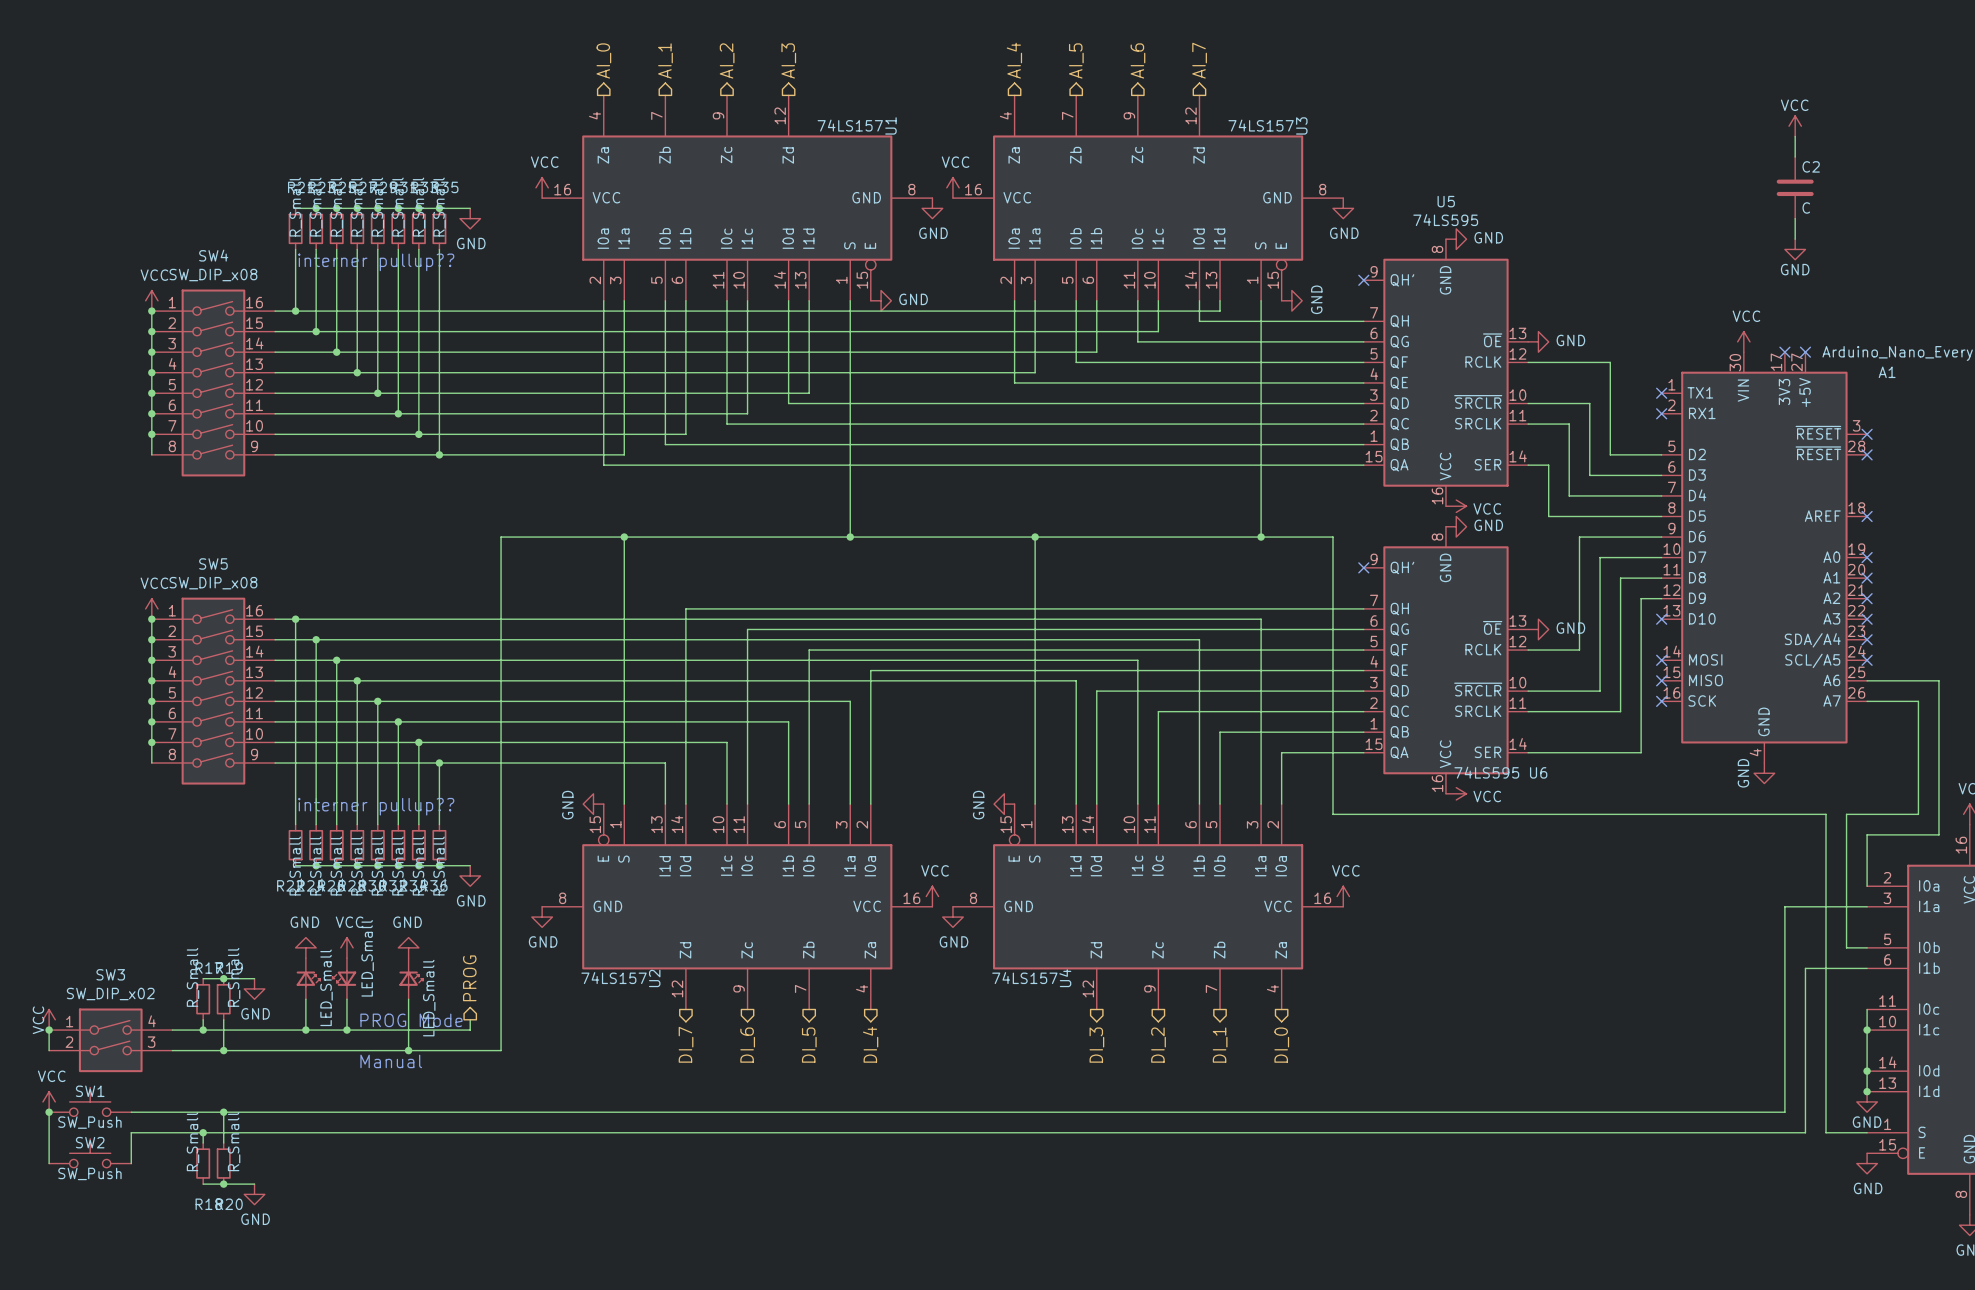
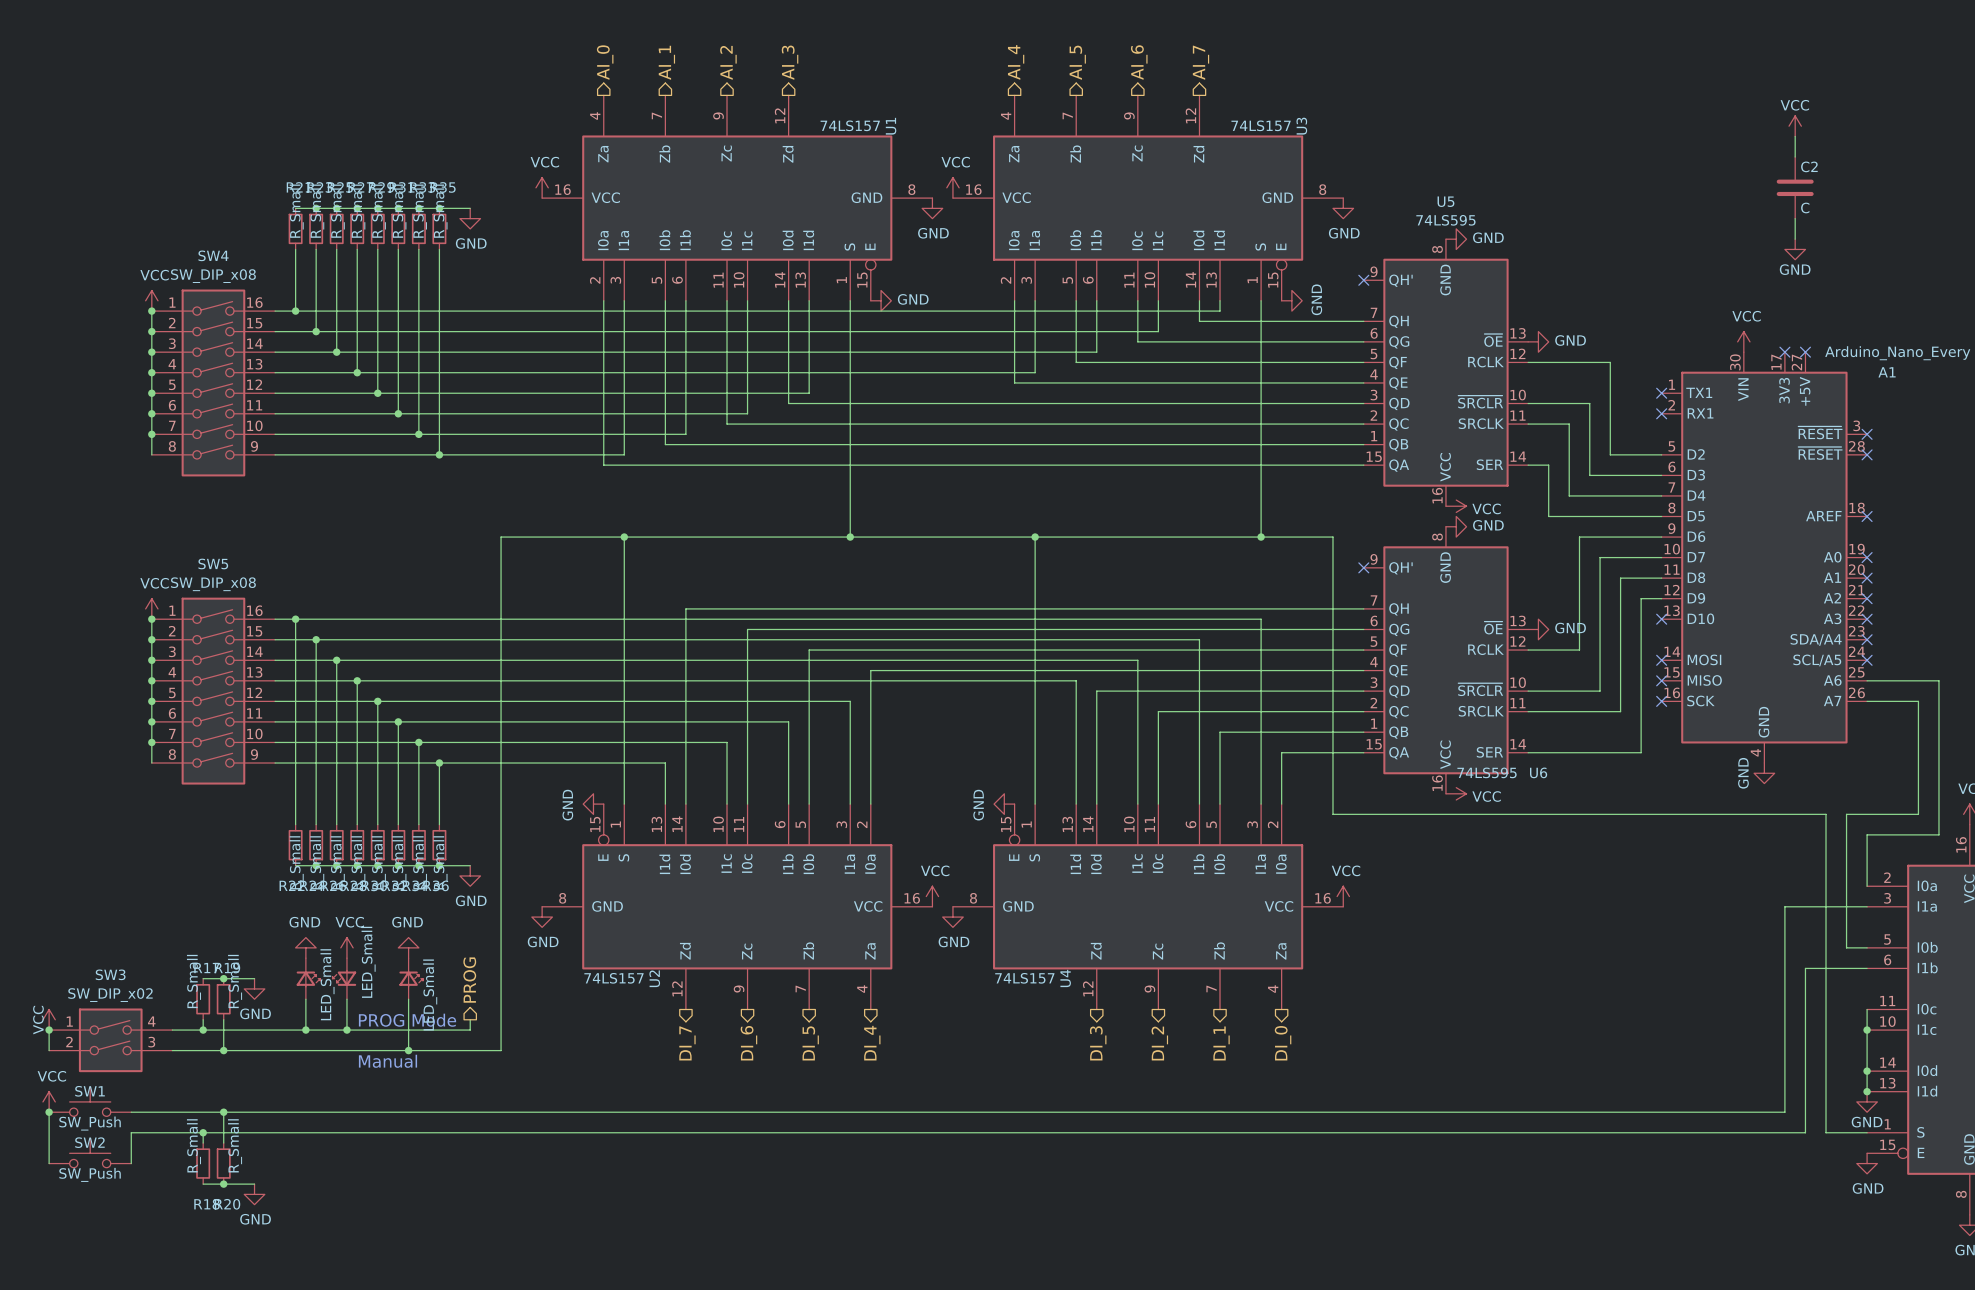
text: interner pullup?? (376, 262) -> none
text: interner pullup?? (376, 806) -> none

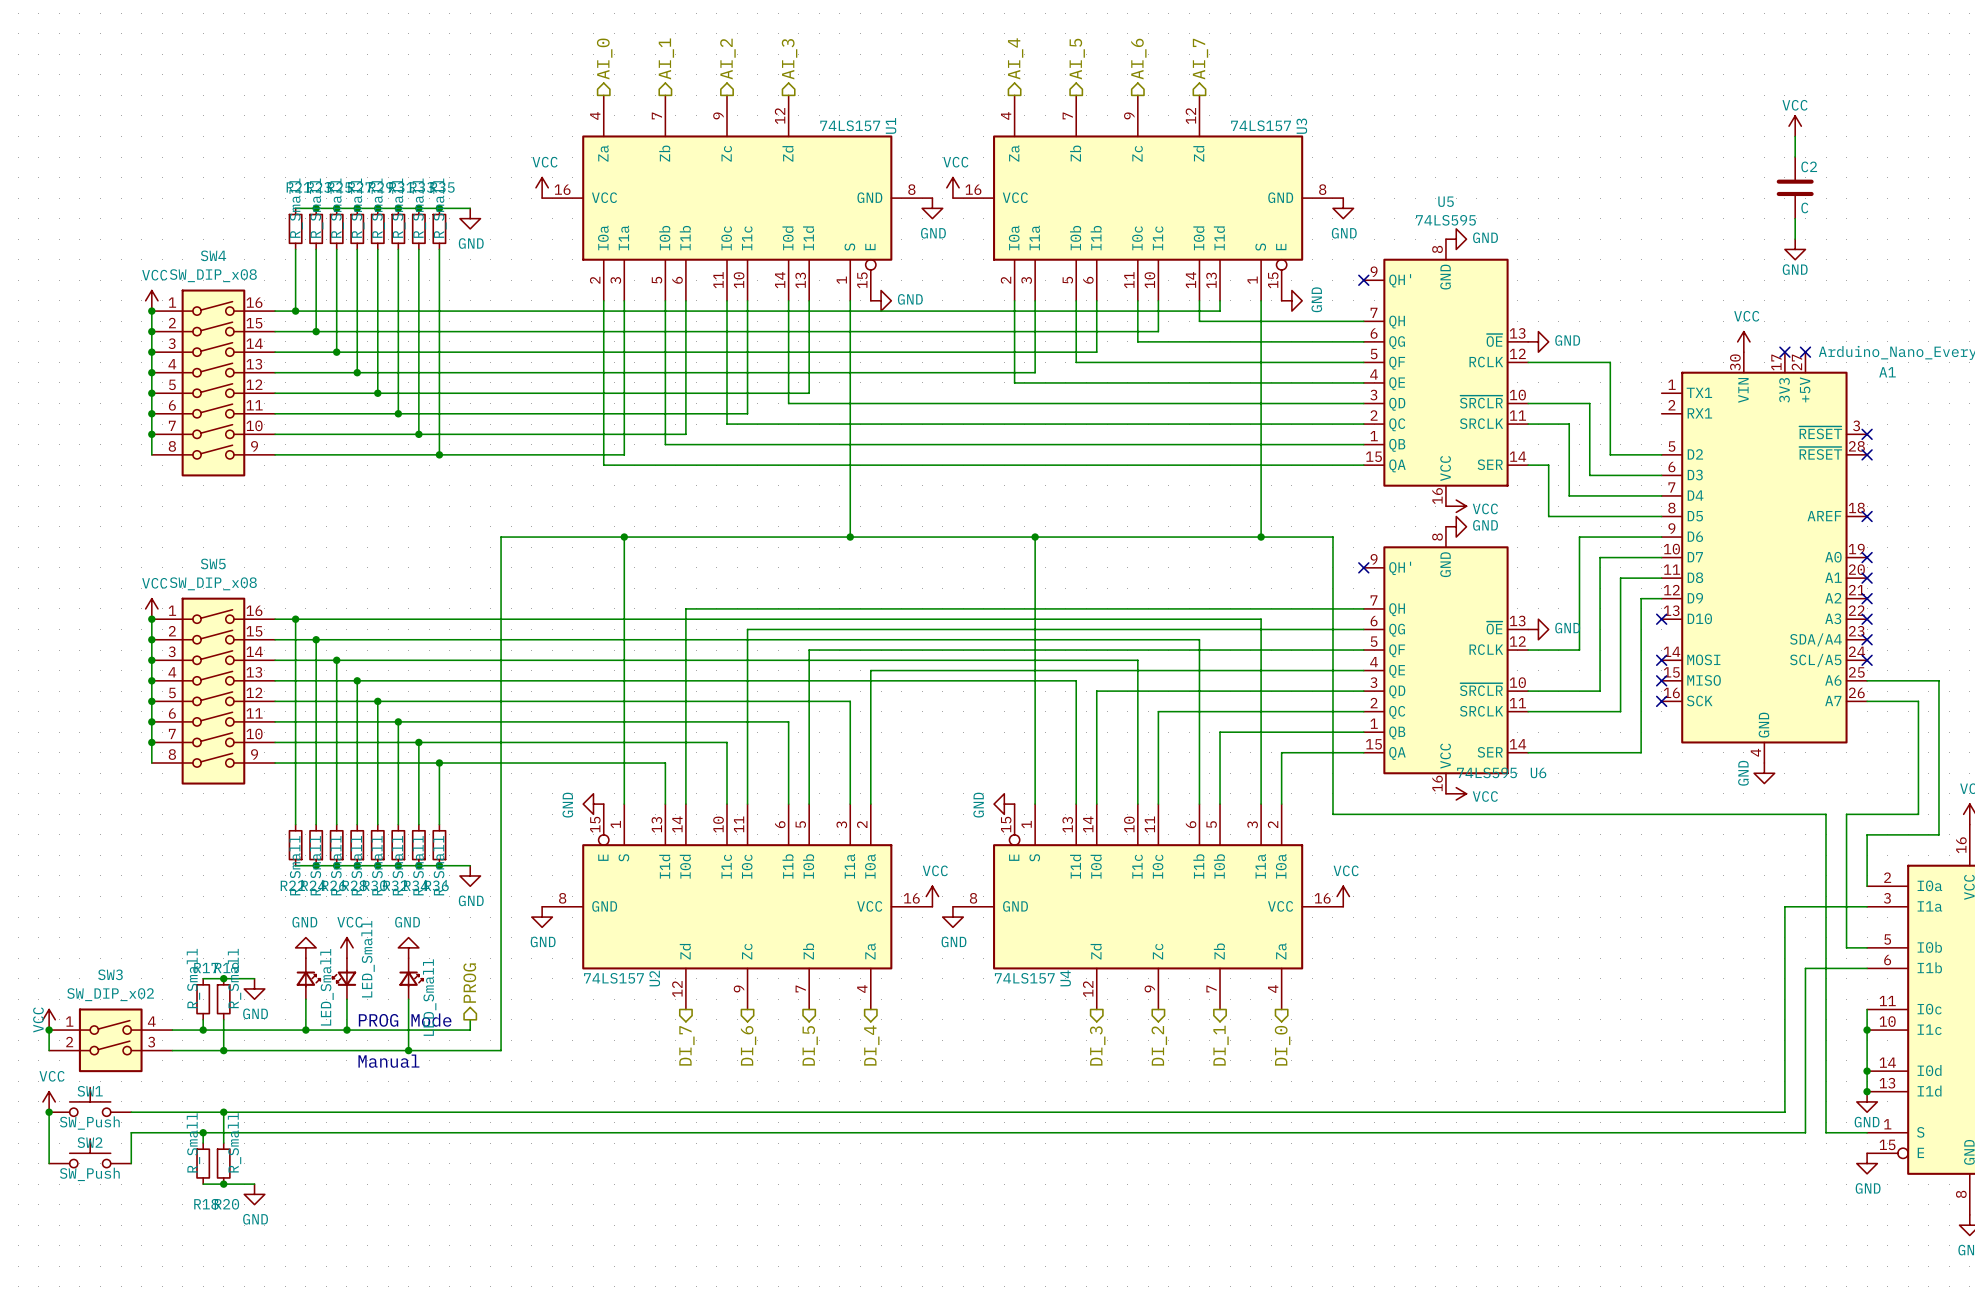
no-connect mark: (1661, 393) -> none
no-connect mark: (1661, 413) -> none

